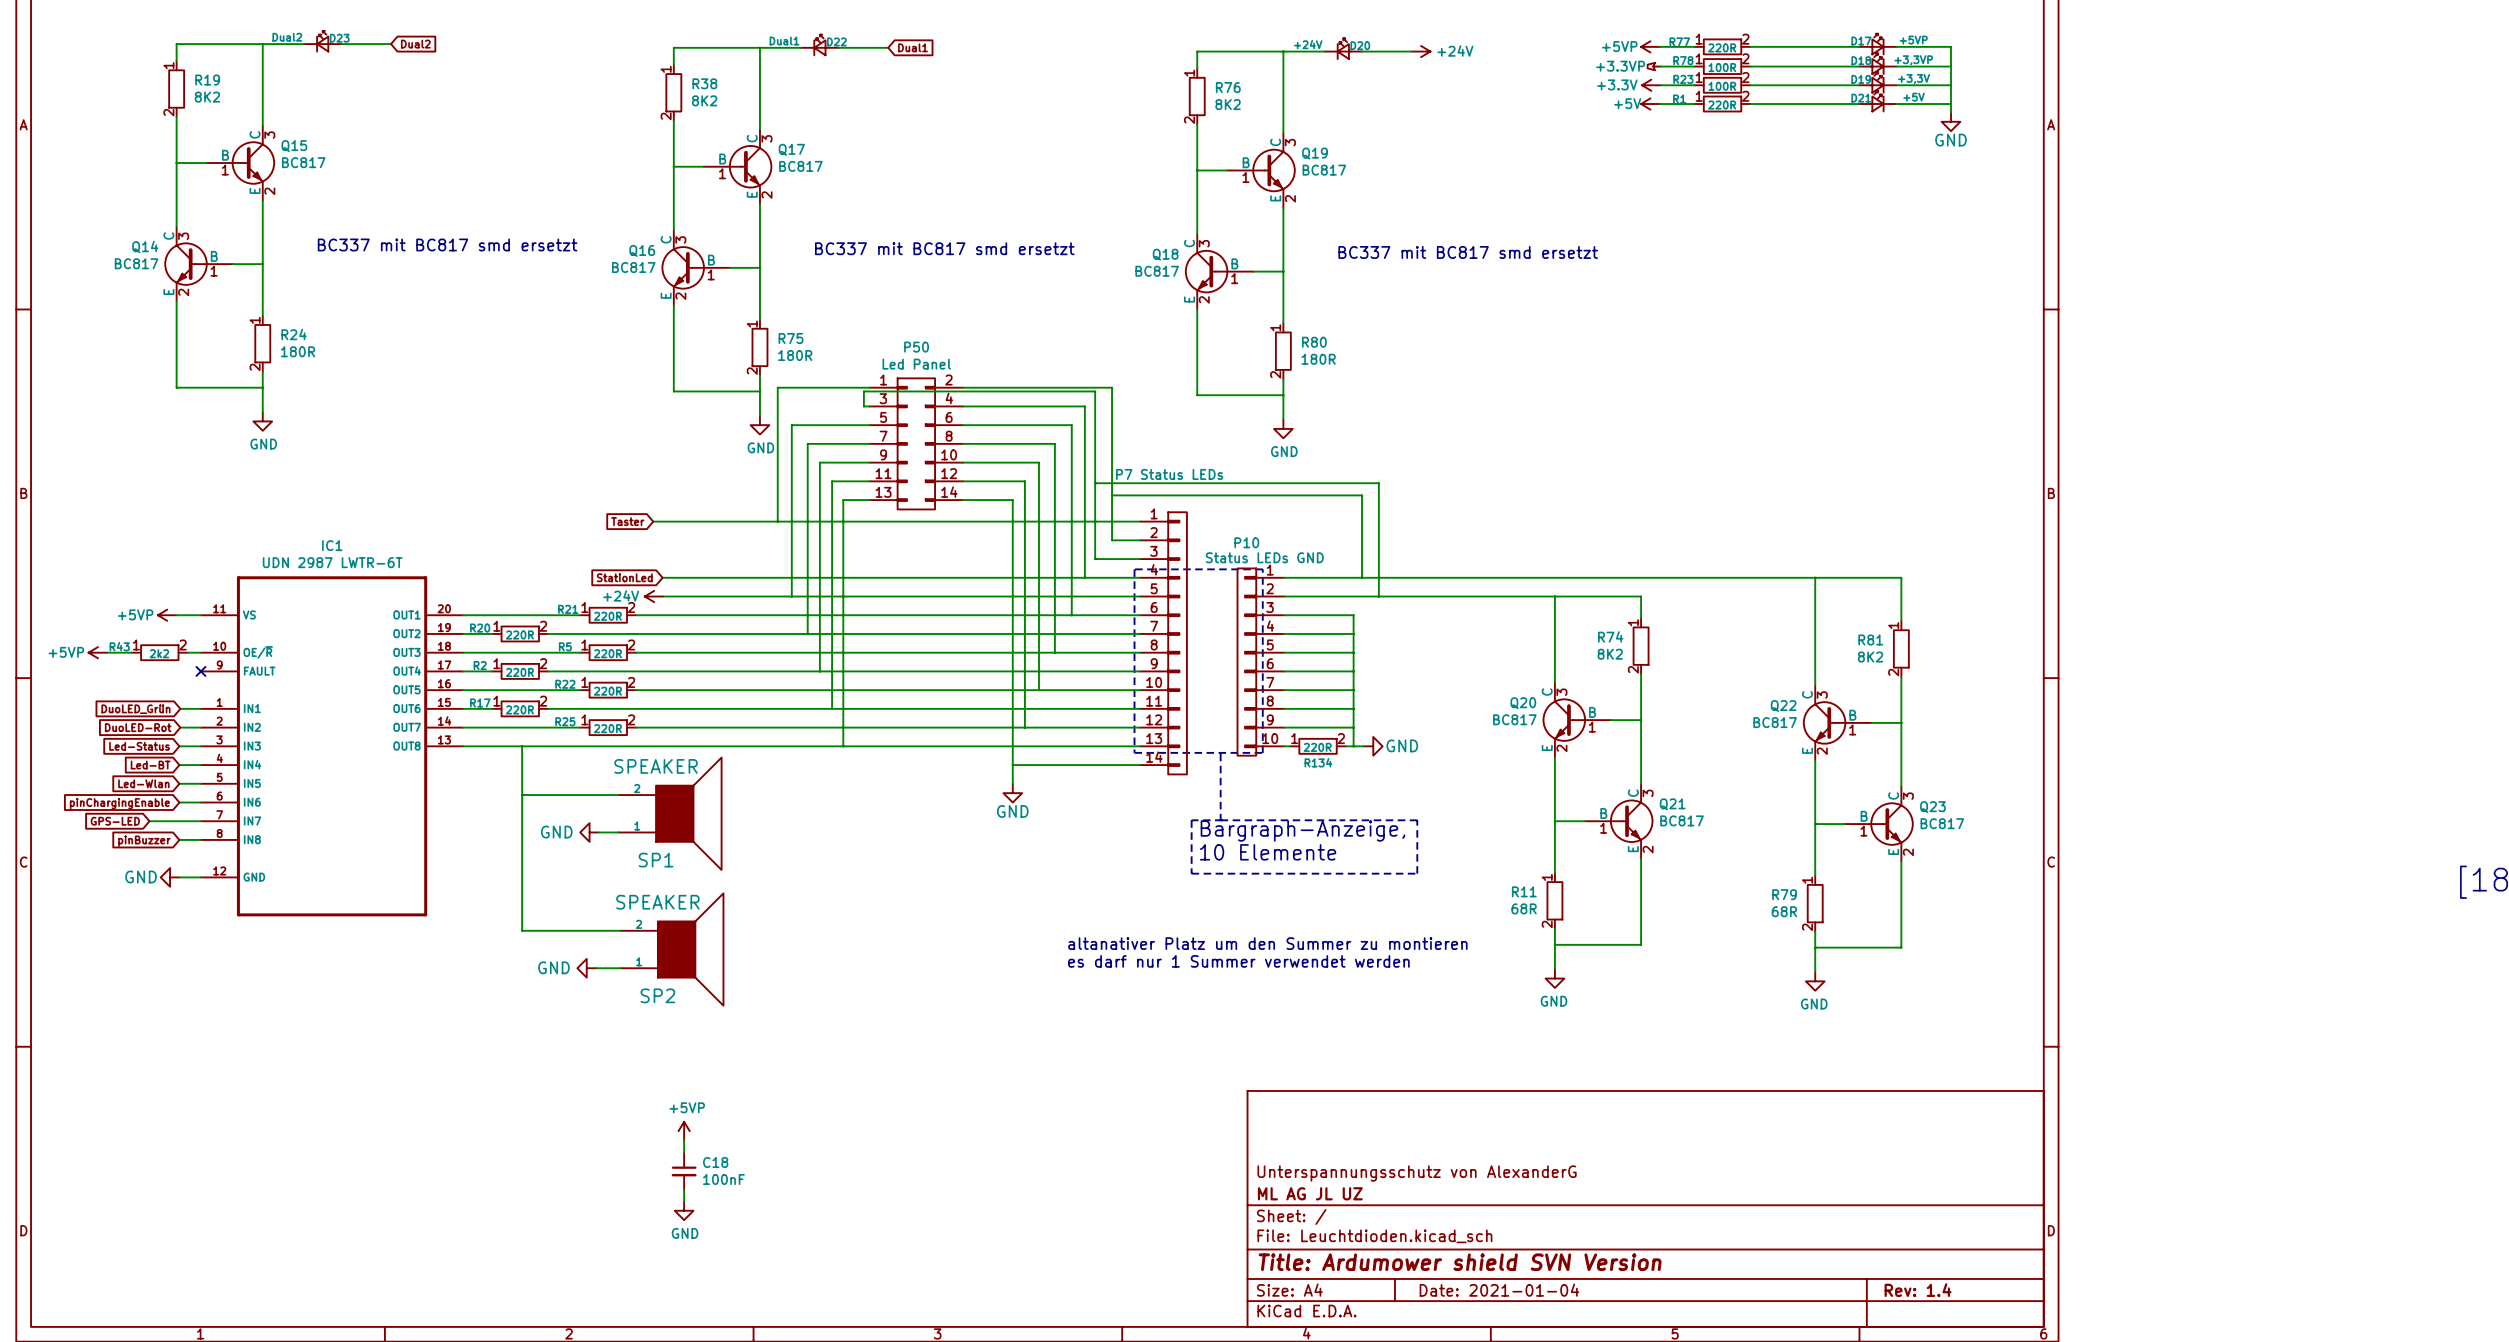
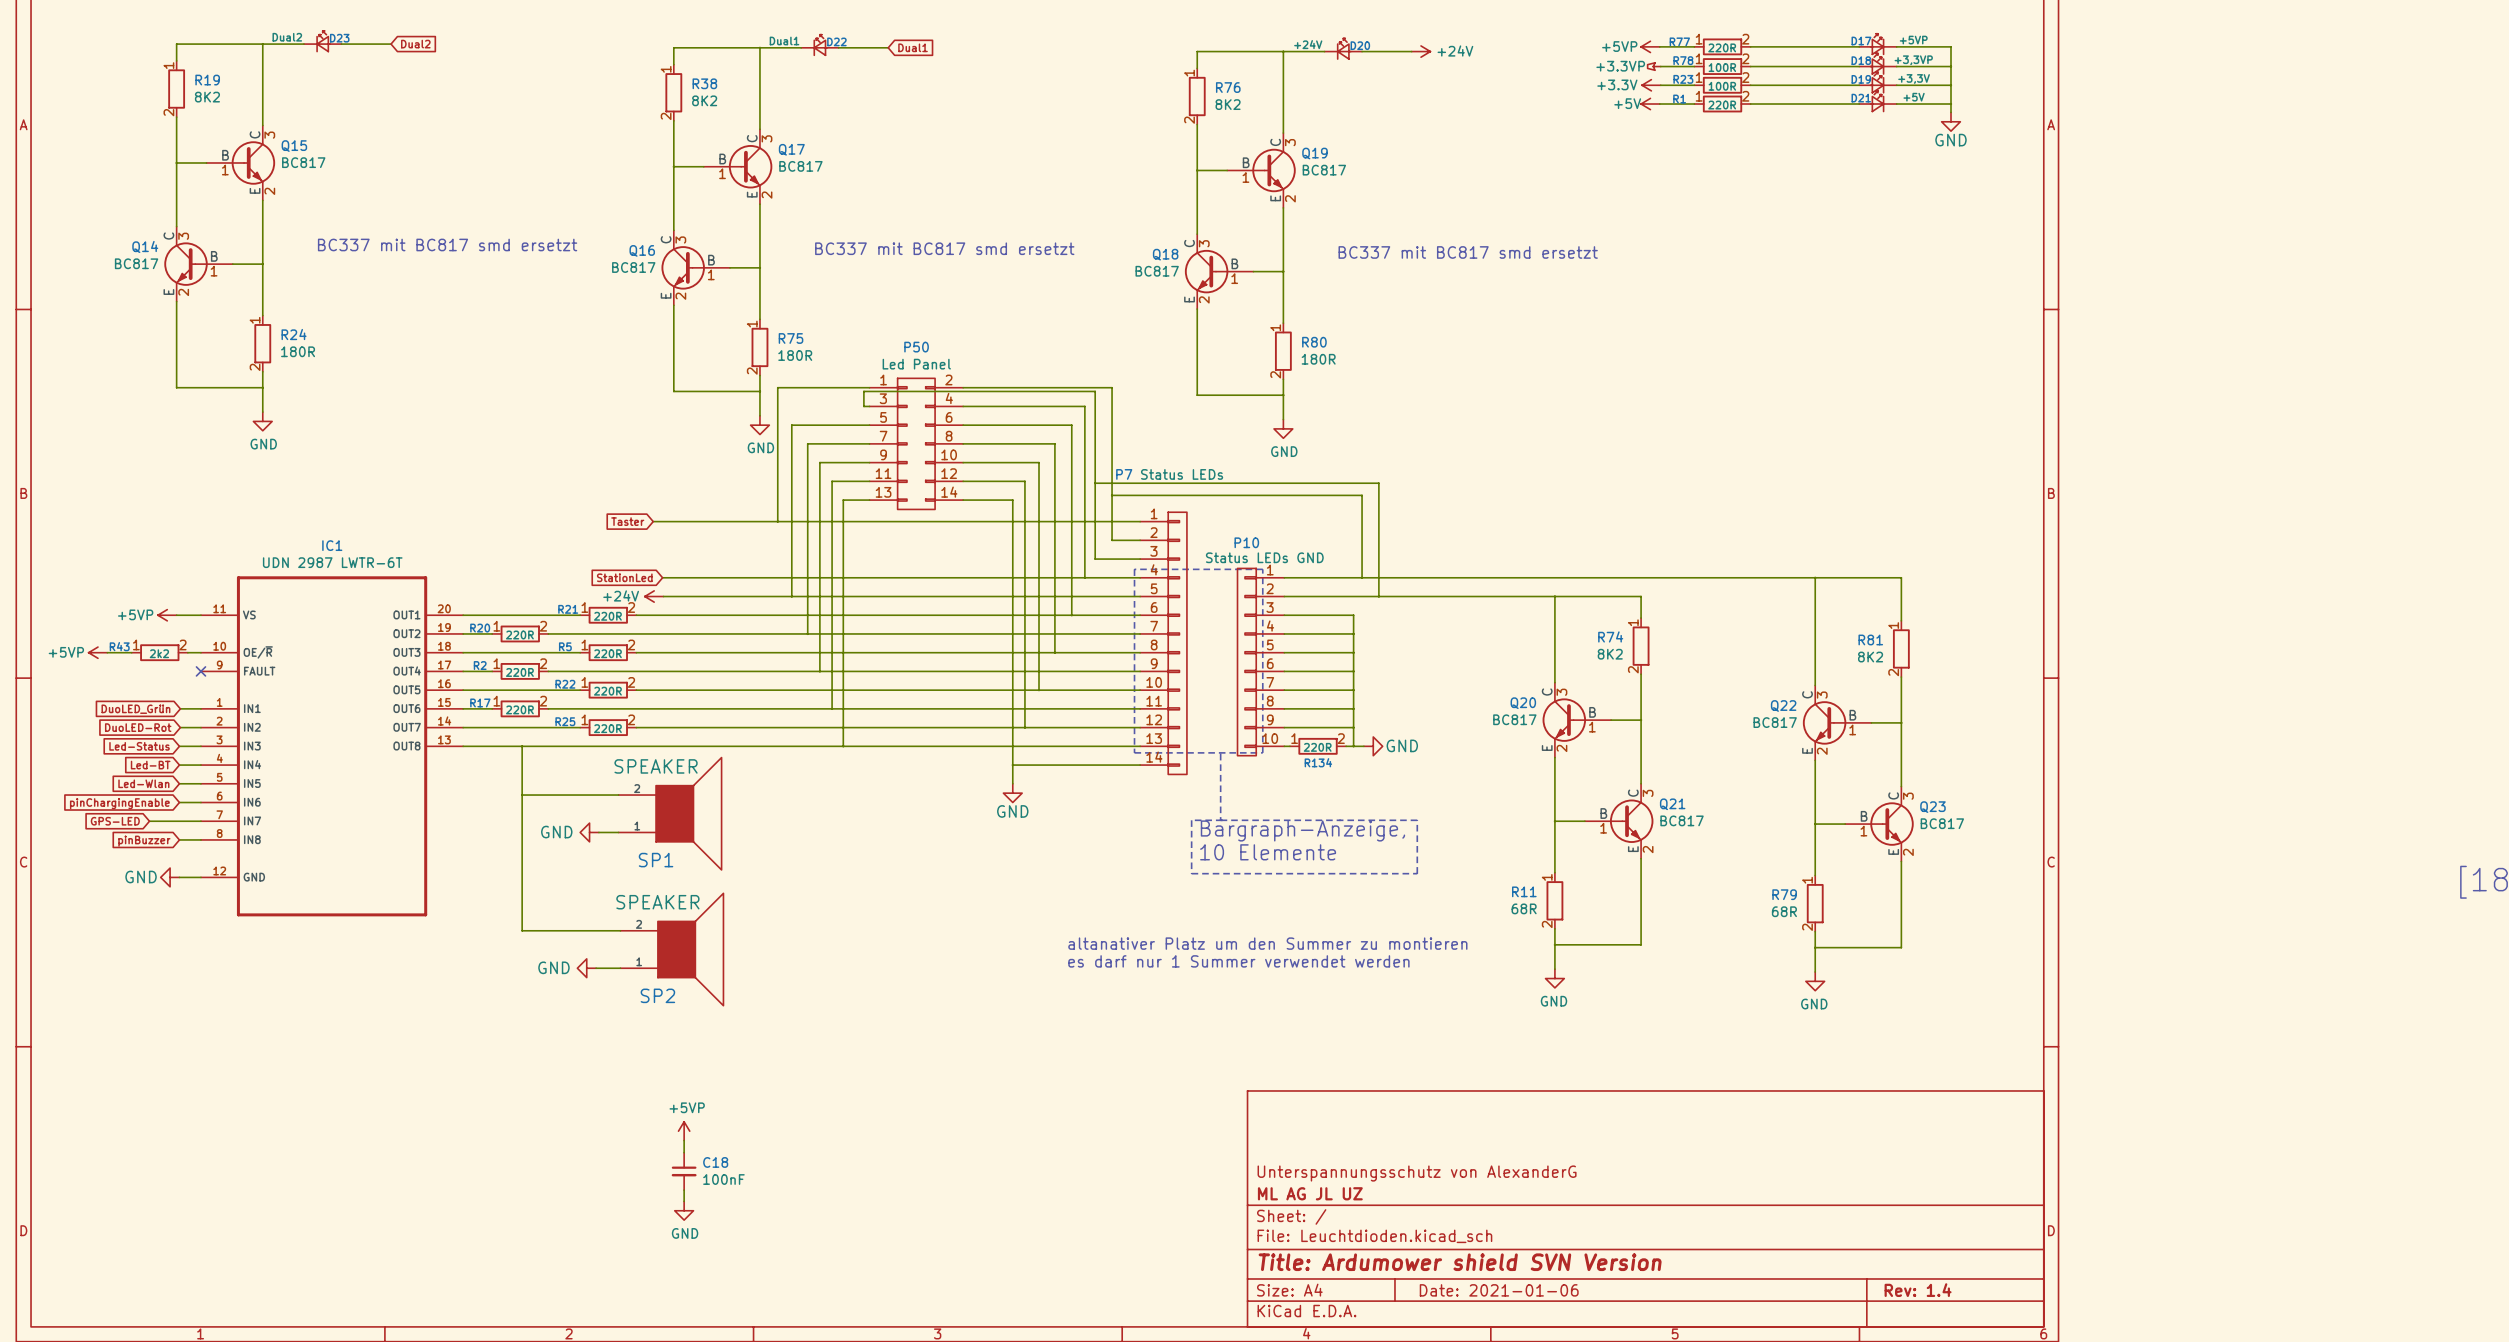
title block: Date: 2021-01-04 (1499, 1290) -> Date: 2021-01-06 (1499, 1290)

